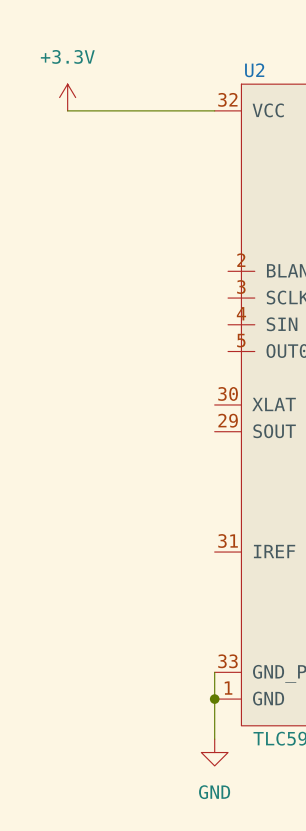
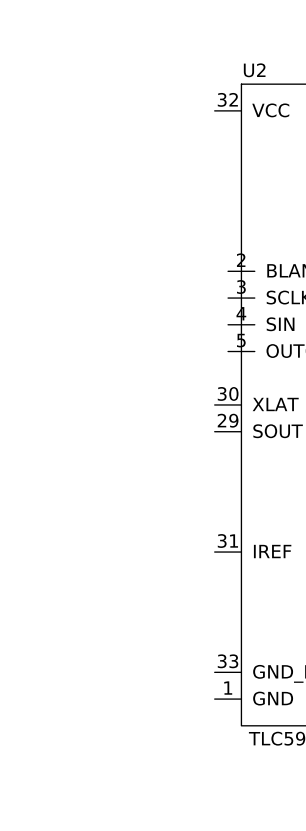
power symbol: +3.3V (67, 97) -> none
wire: (67, 110) (214, 110) -> none
wire: (214, 672) (214, 739) -> none
junction: (214, 699) -> none
power symbol: GND (214, 752) -> none

